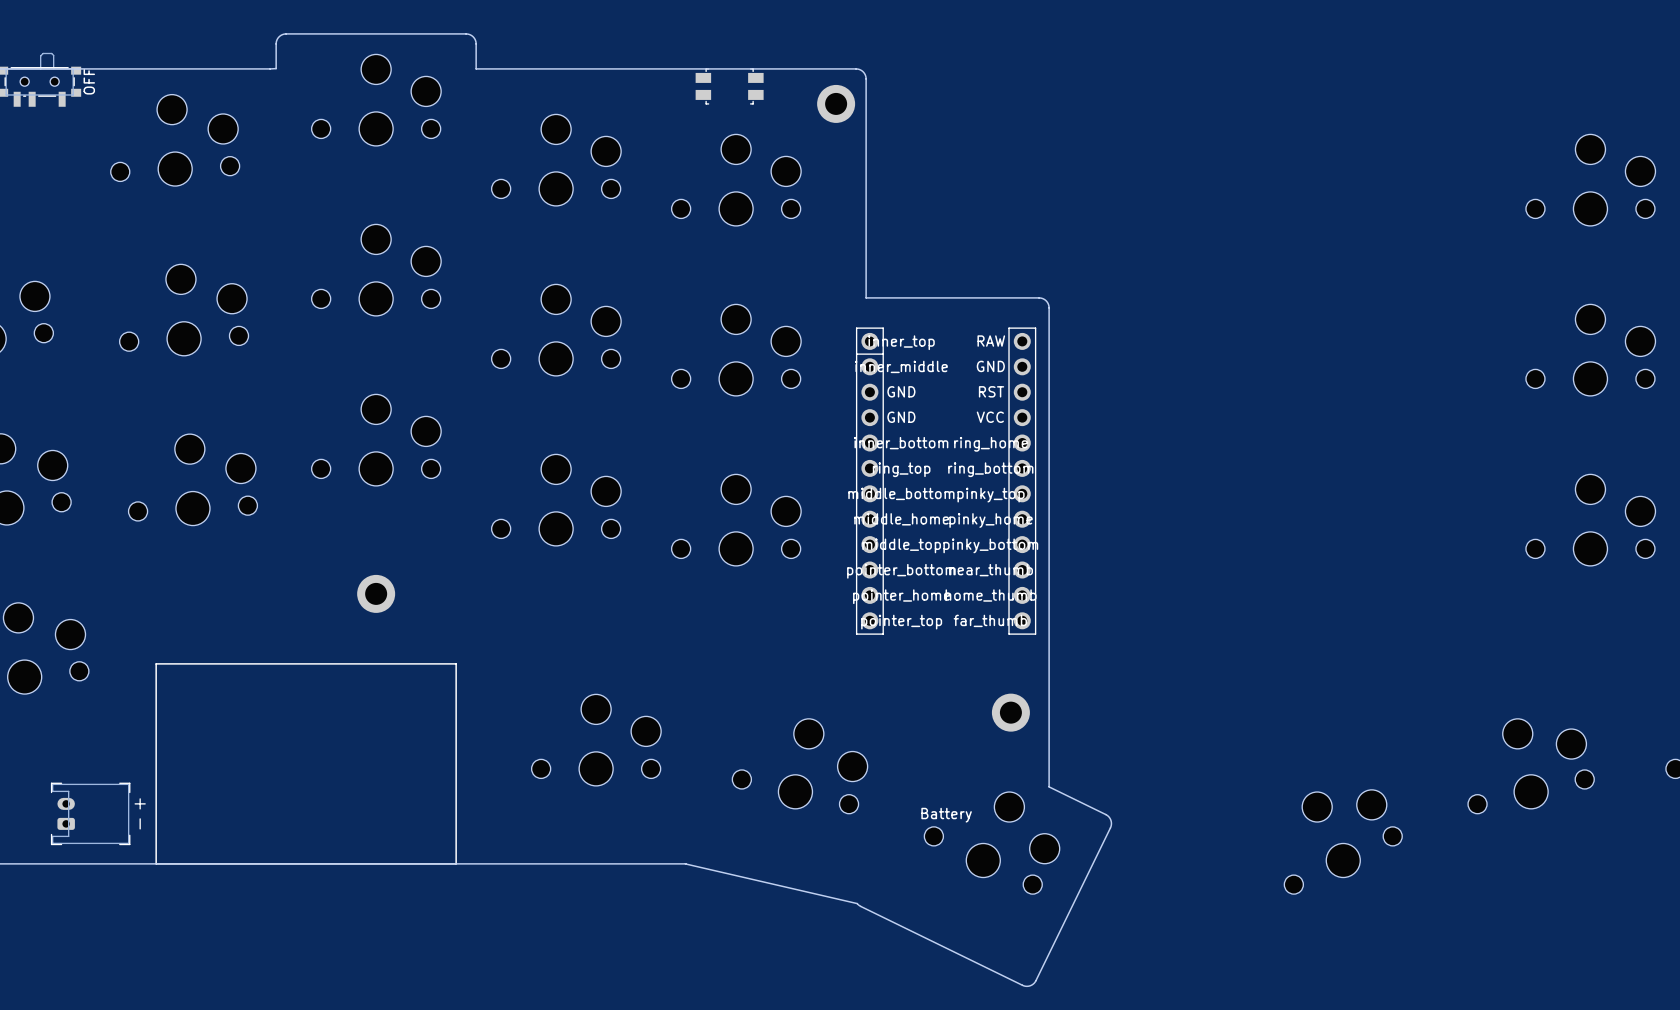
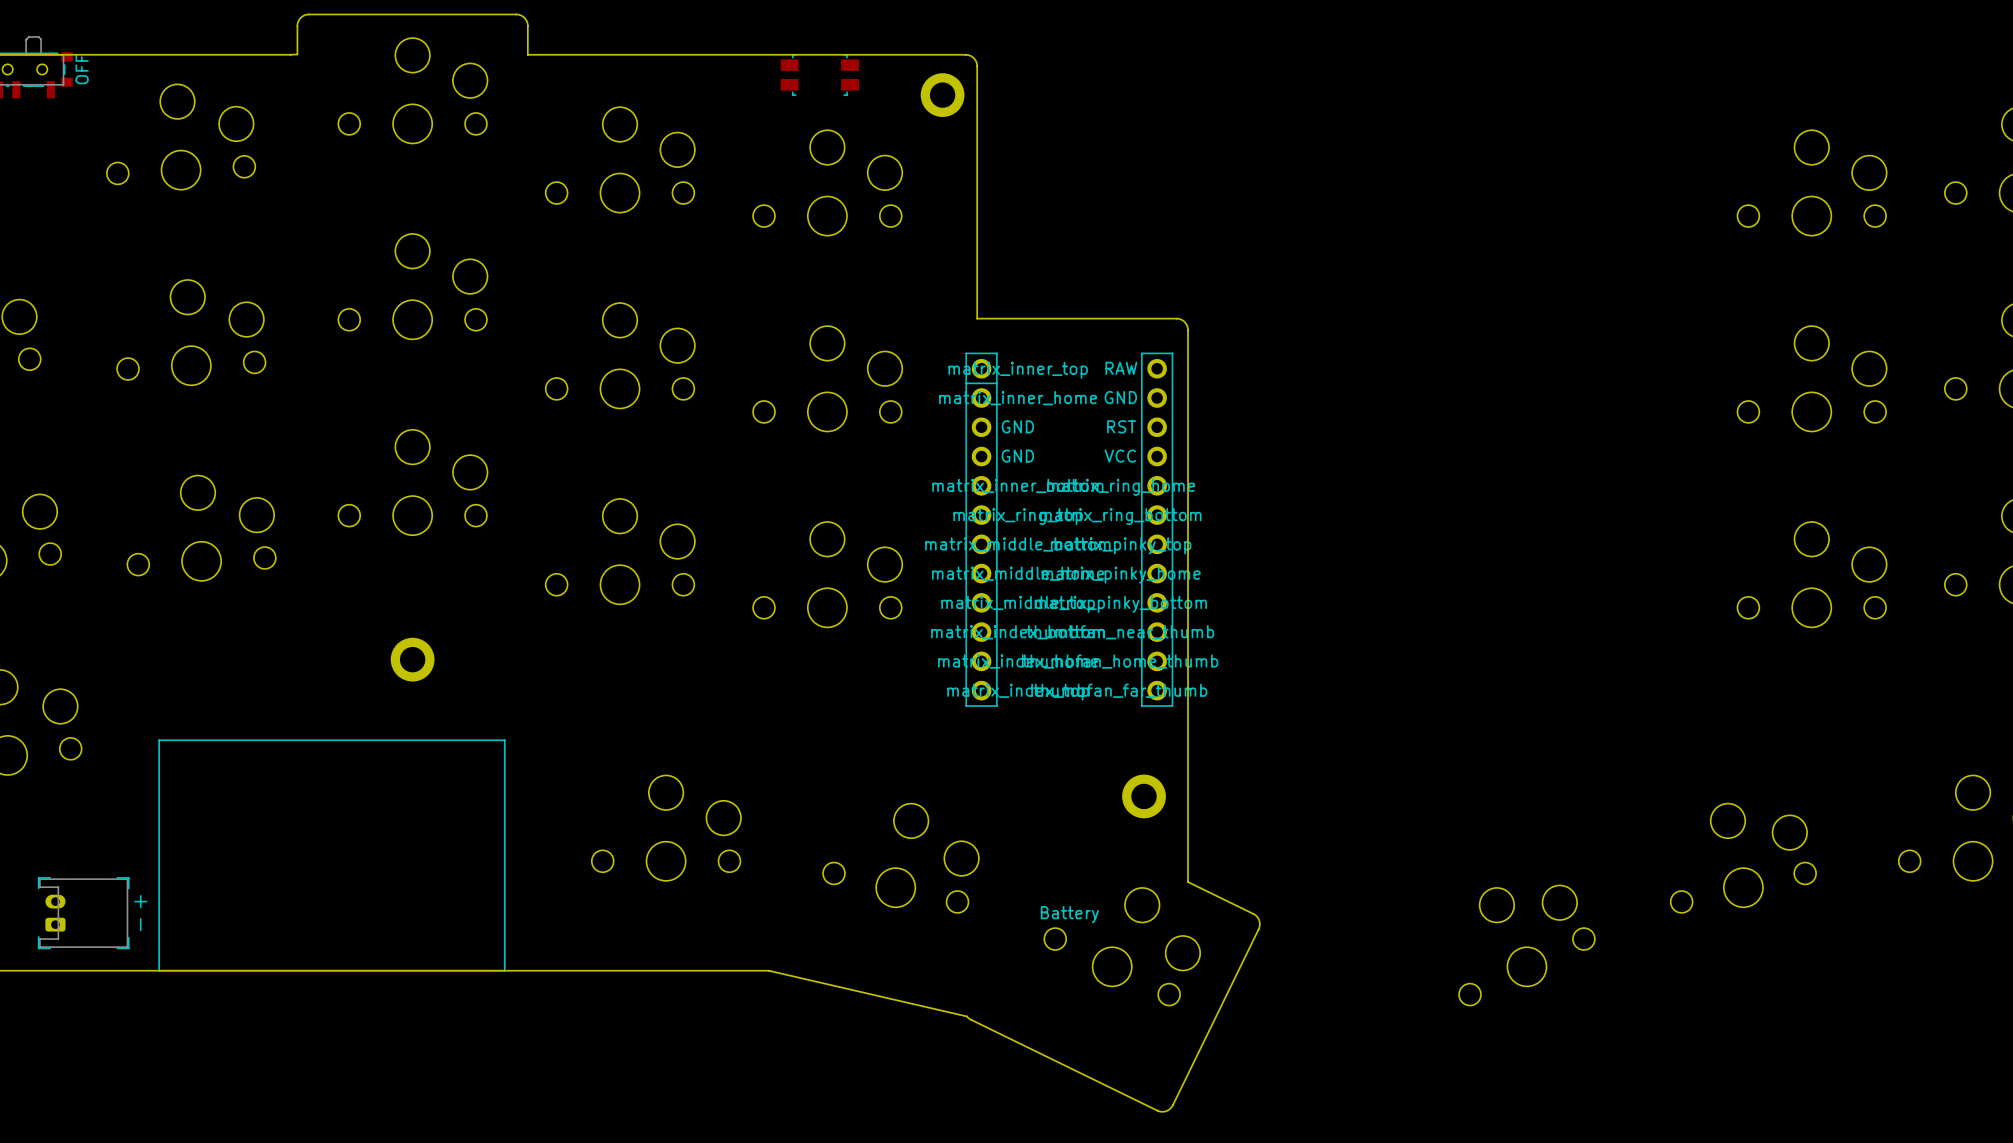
part footprint: [856, 327, 1037, 635] -> [965, 352, 1174, 707]

